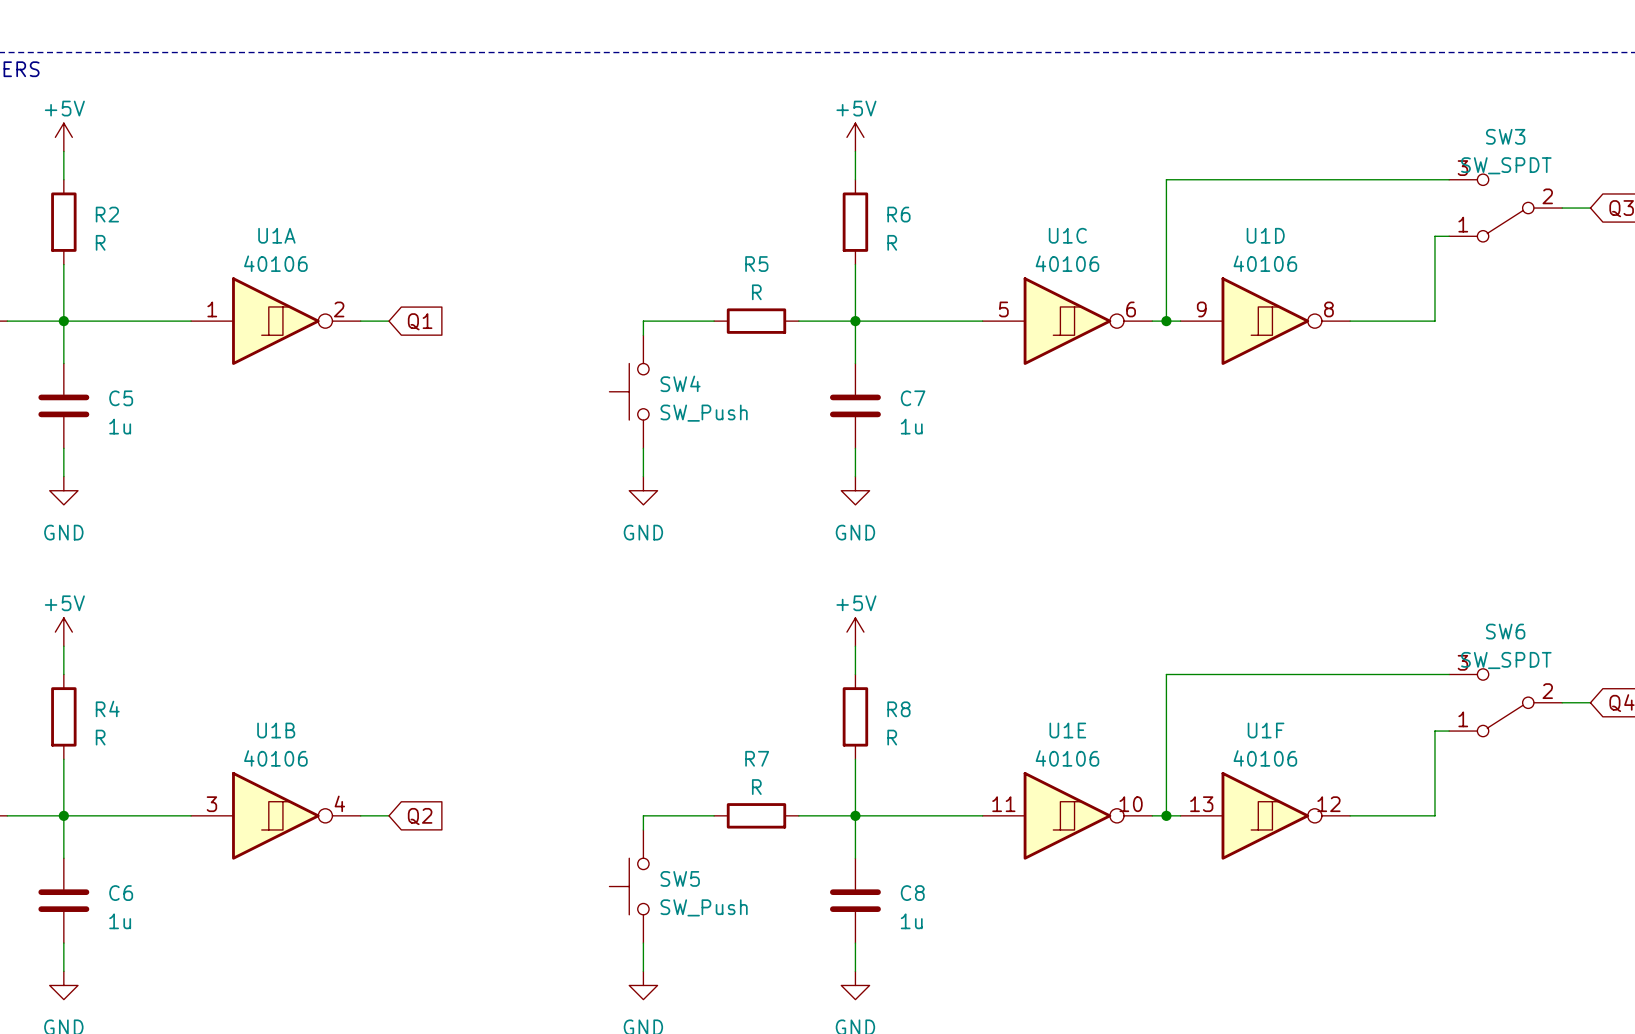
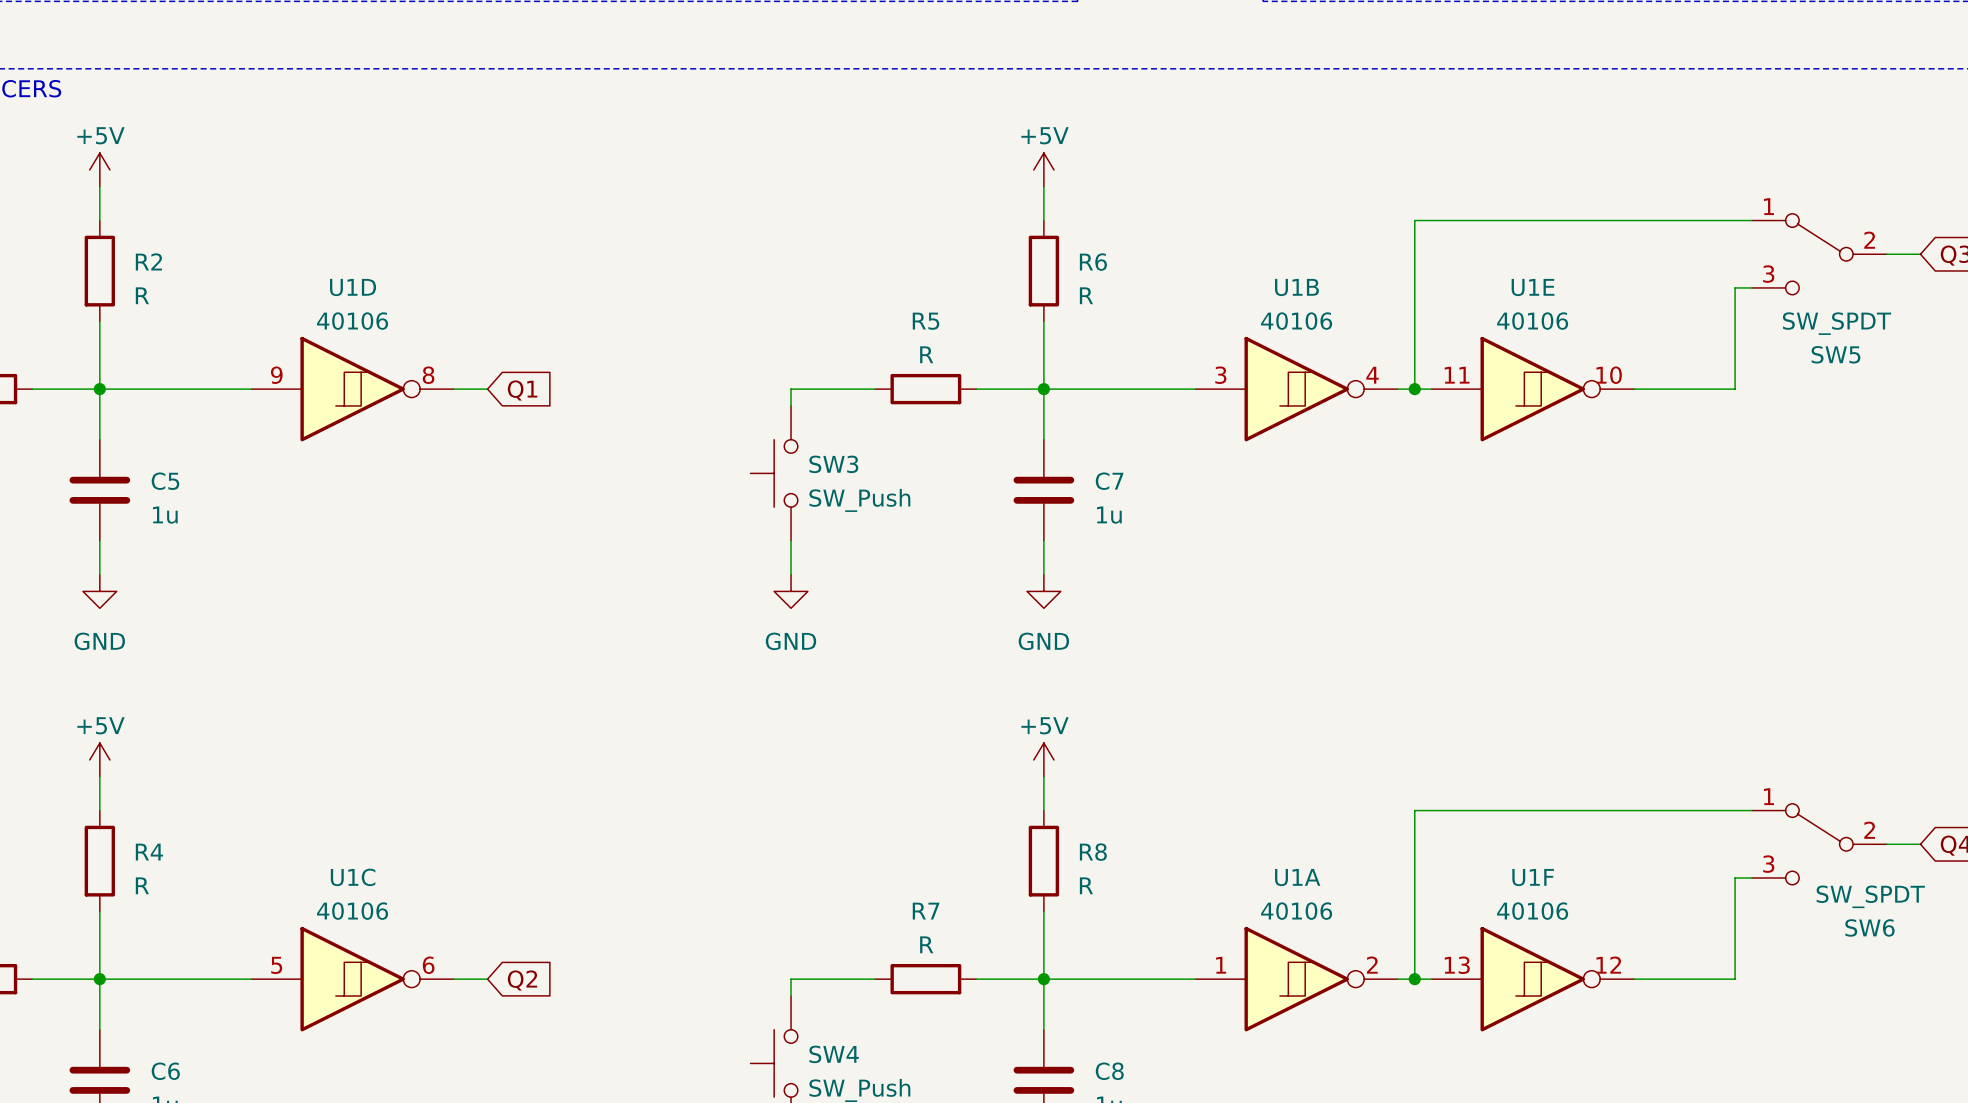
SW3: SW_SPDT (1505, 208) -> none
SW5: none -> SW_SPDT (1819, 254)
U1A position: (275, 321) -> (1296, 979)
U1C position: (1067, 321) -> (352, 979)
U1D position: (1265, 321) -> (352, 389)
SW4 name: SW4 (680, 383) -> SW3 (833, 464)
SW6 name position: SW6 (1505, 631) -> SW6 (1869, 927)
SW6 value position: SW_SPDT (1506, 660) -> SW_SPDT (1870, 896)
SW6 flip: as is (1505, 702) -> up-down (1819, 844)
U1B position: (275, 815) -> (1296, 389)
U1E position: (1067, 815) -> (1532, 389)
SW5 name: SW5 (680, 878) -> SW4 (834, 1054)

